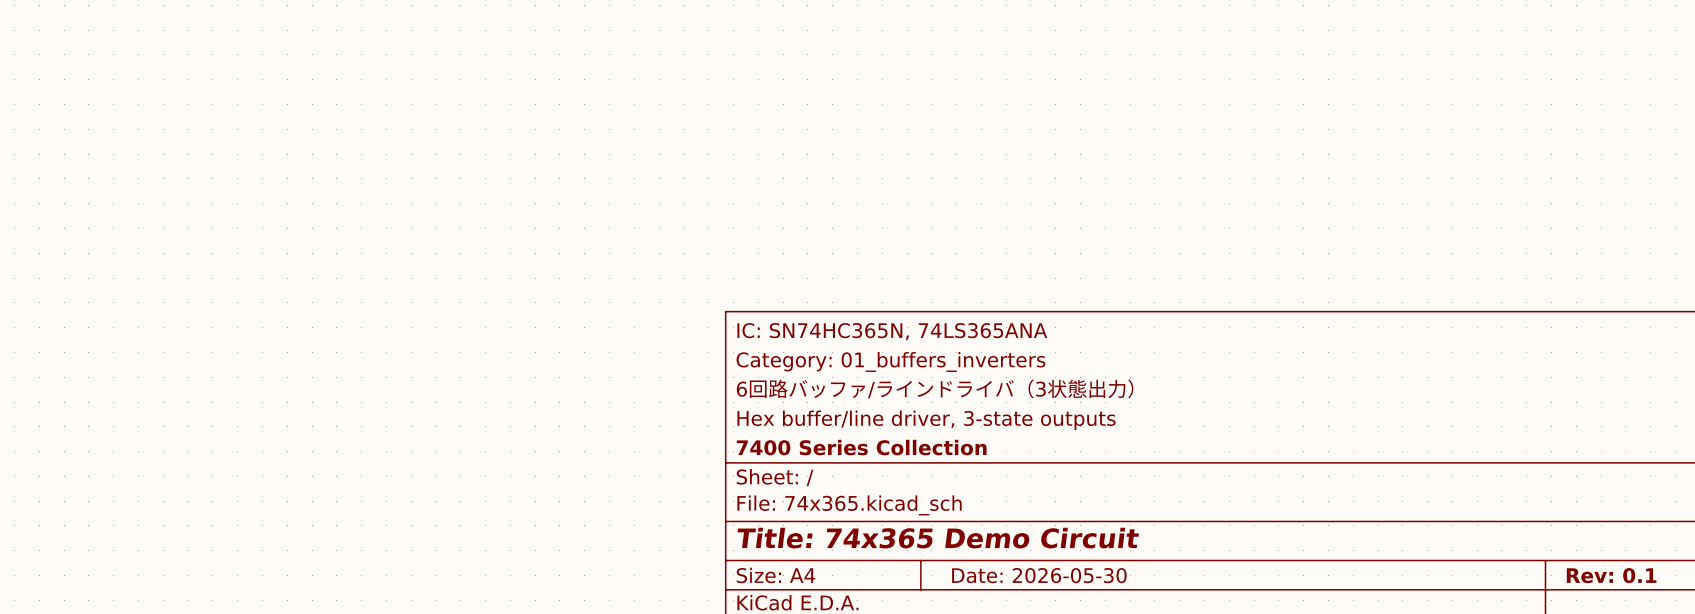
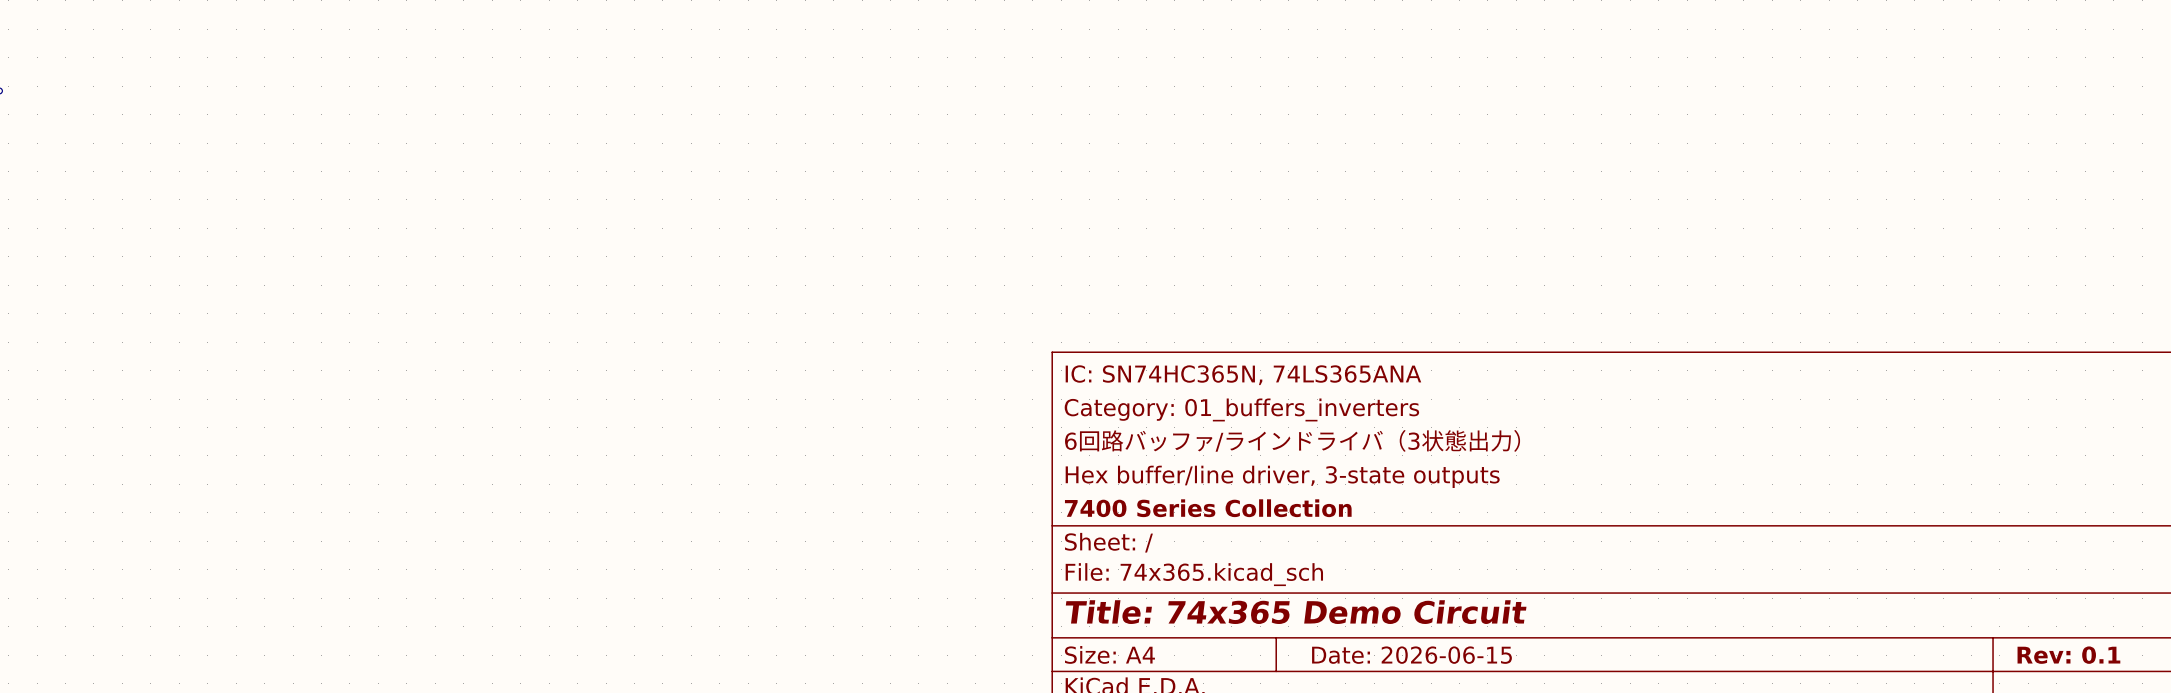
title block: Date: 2026-05-30 (1039, 575) -> Date: 2026-06-15 (1411, 655)

